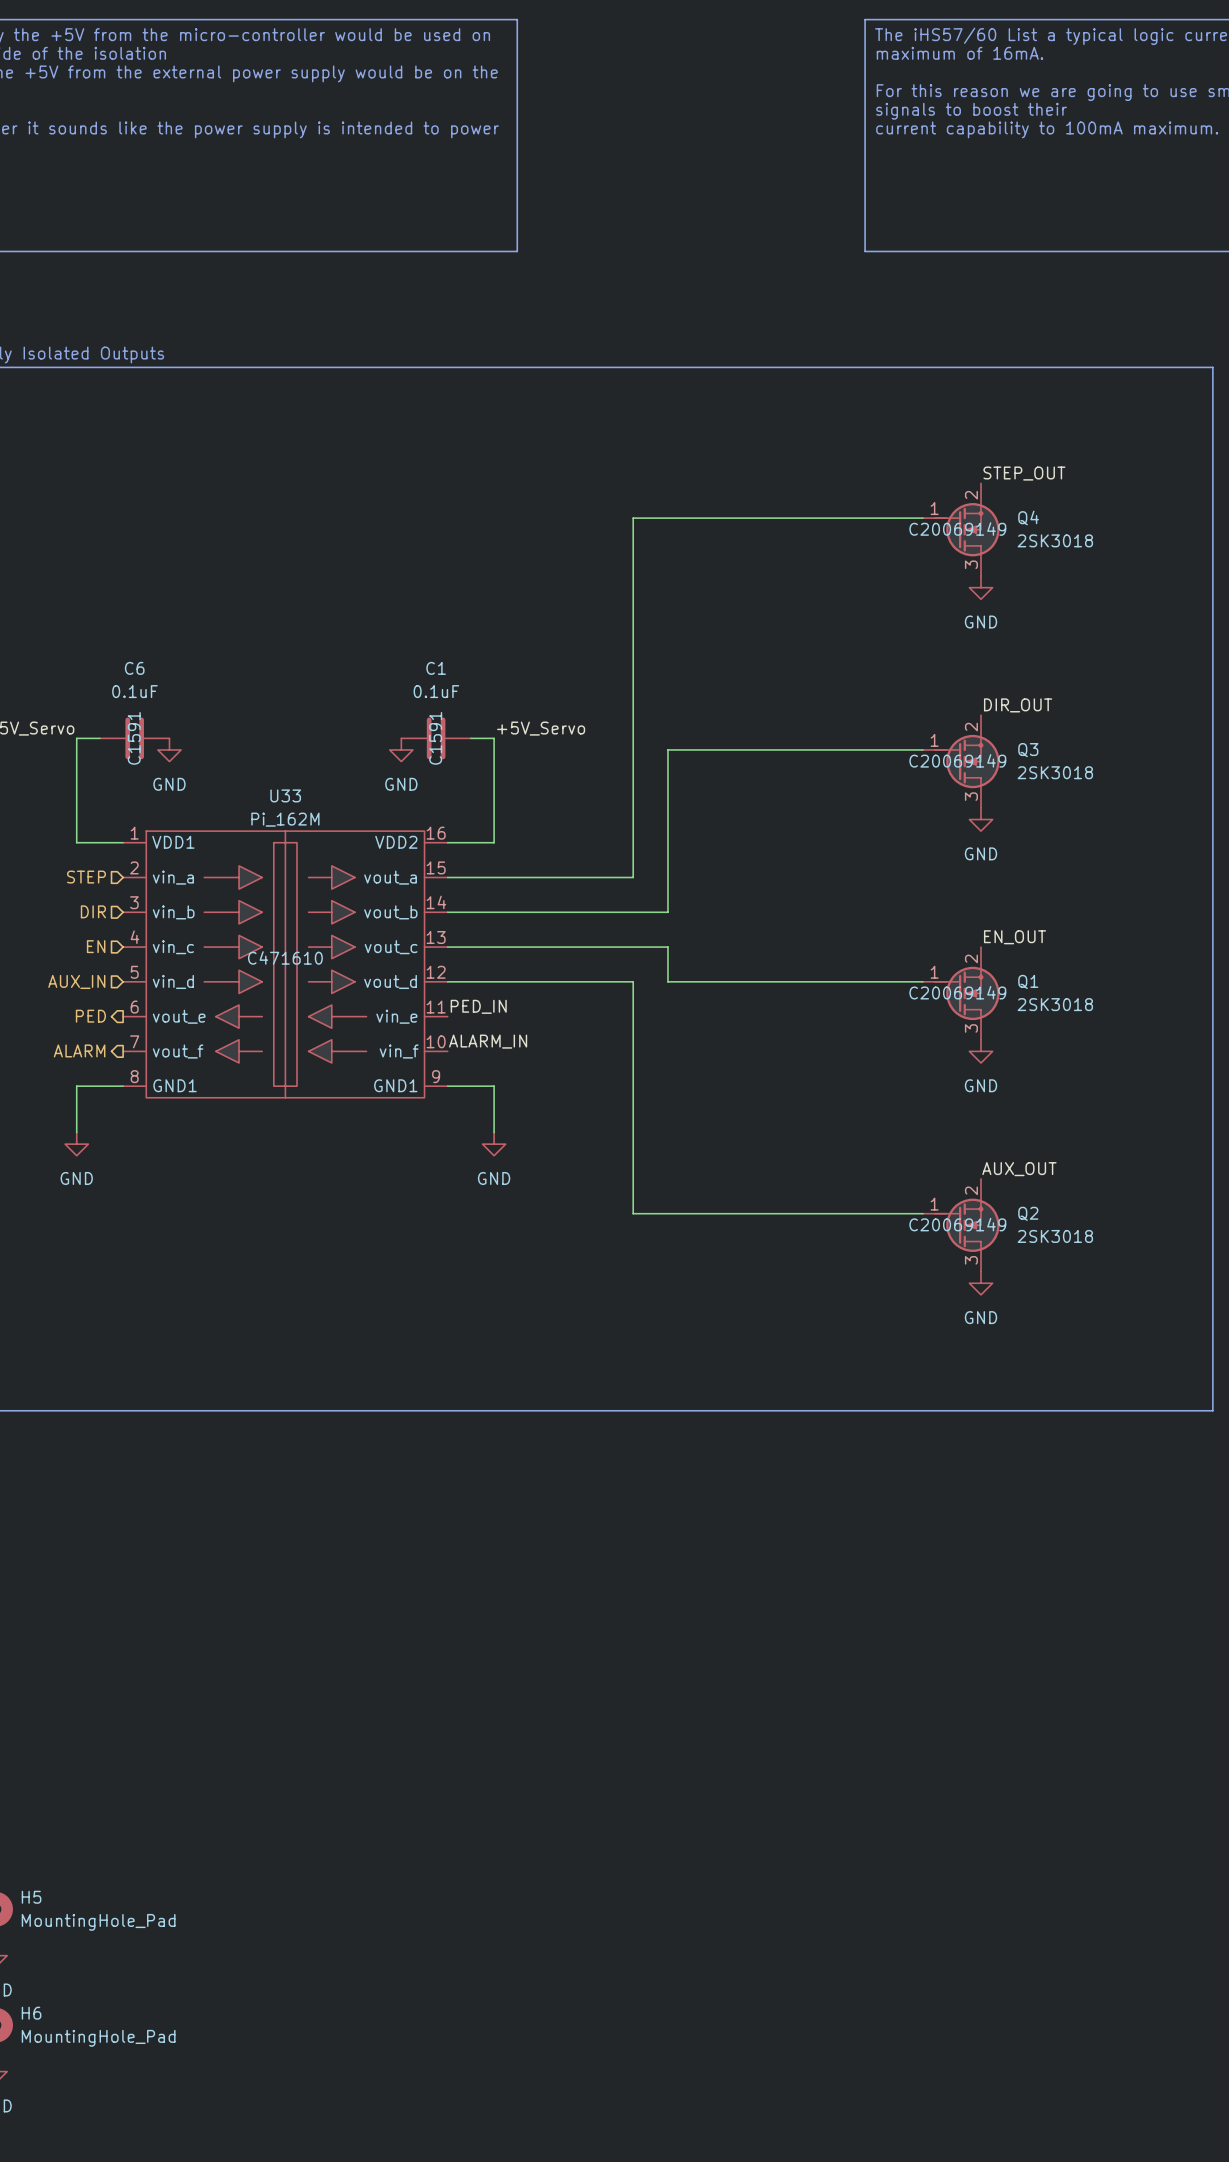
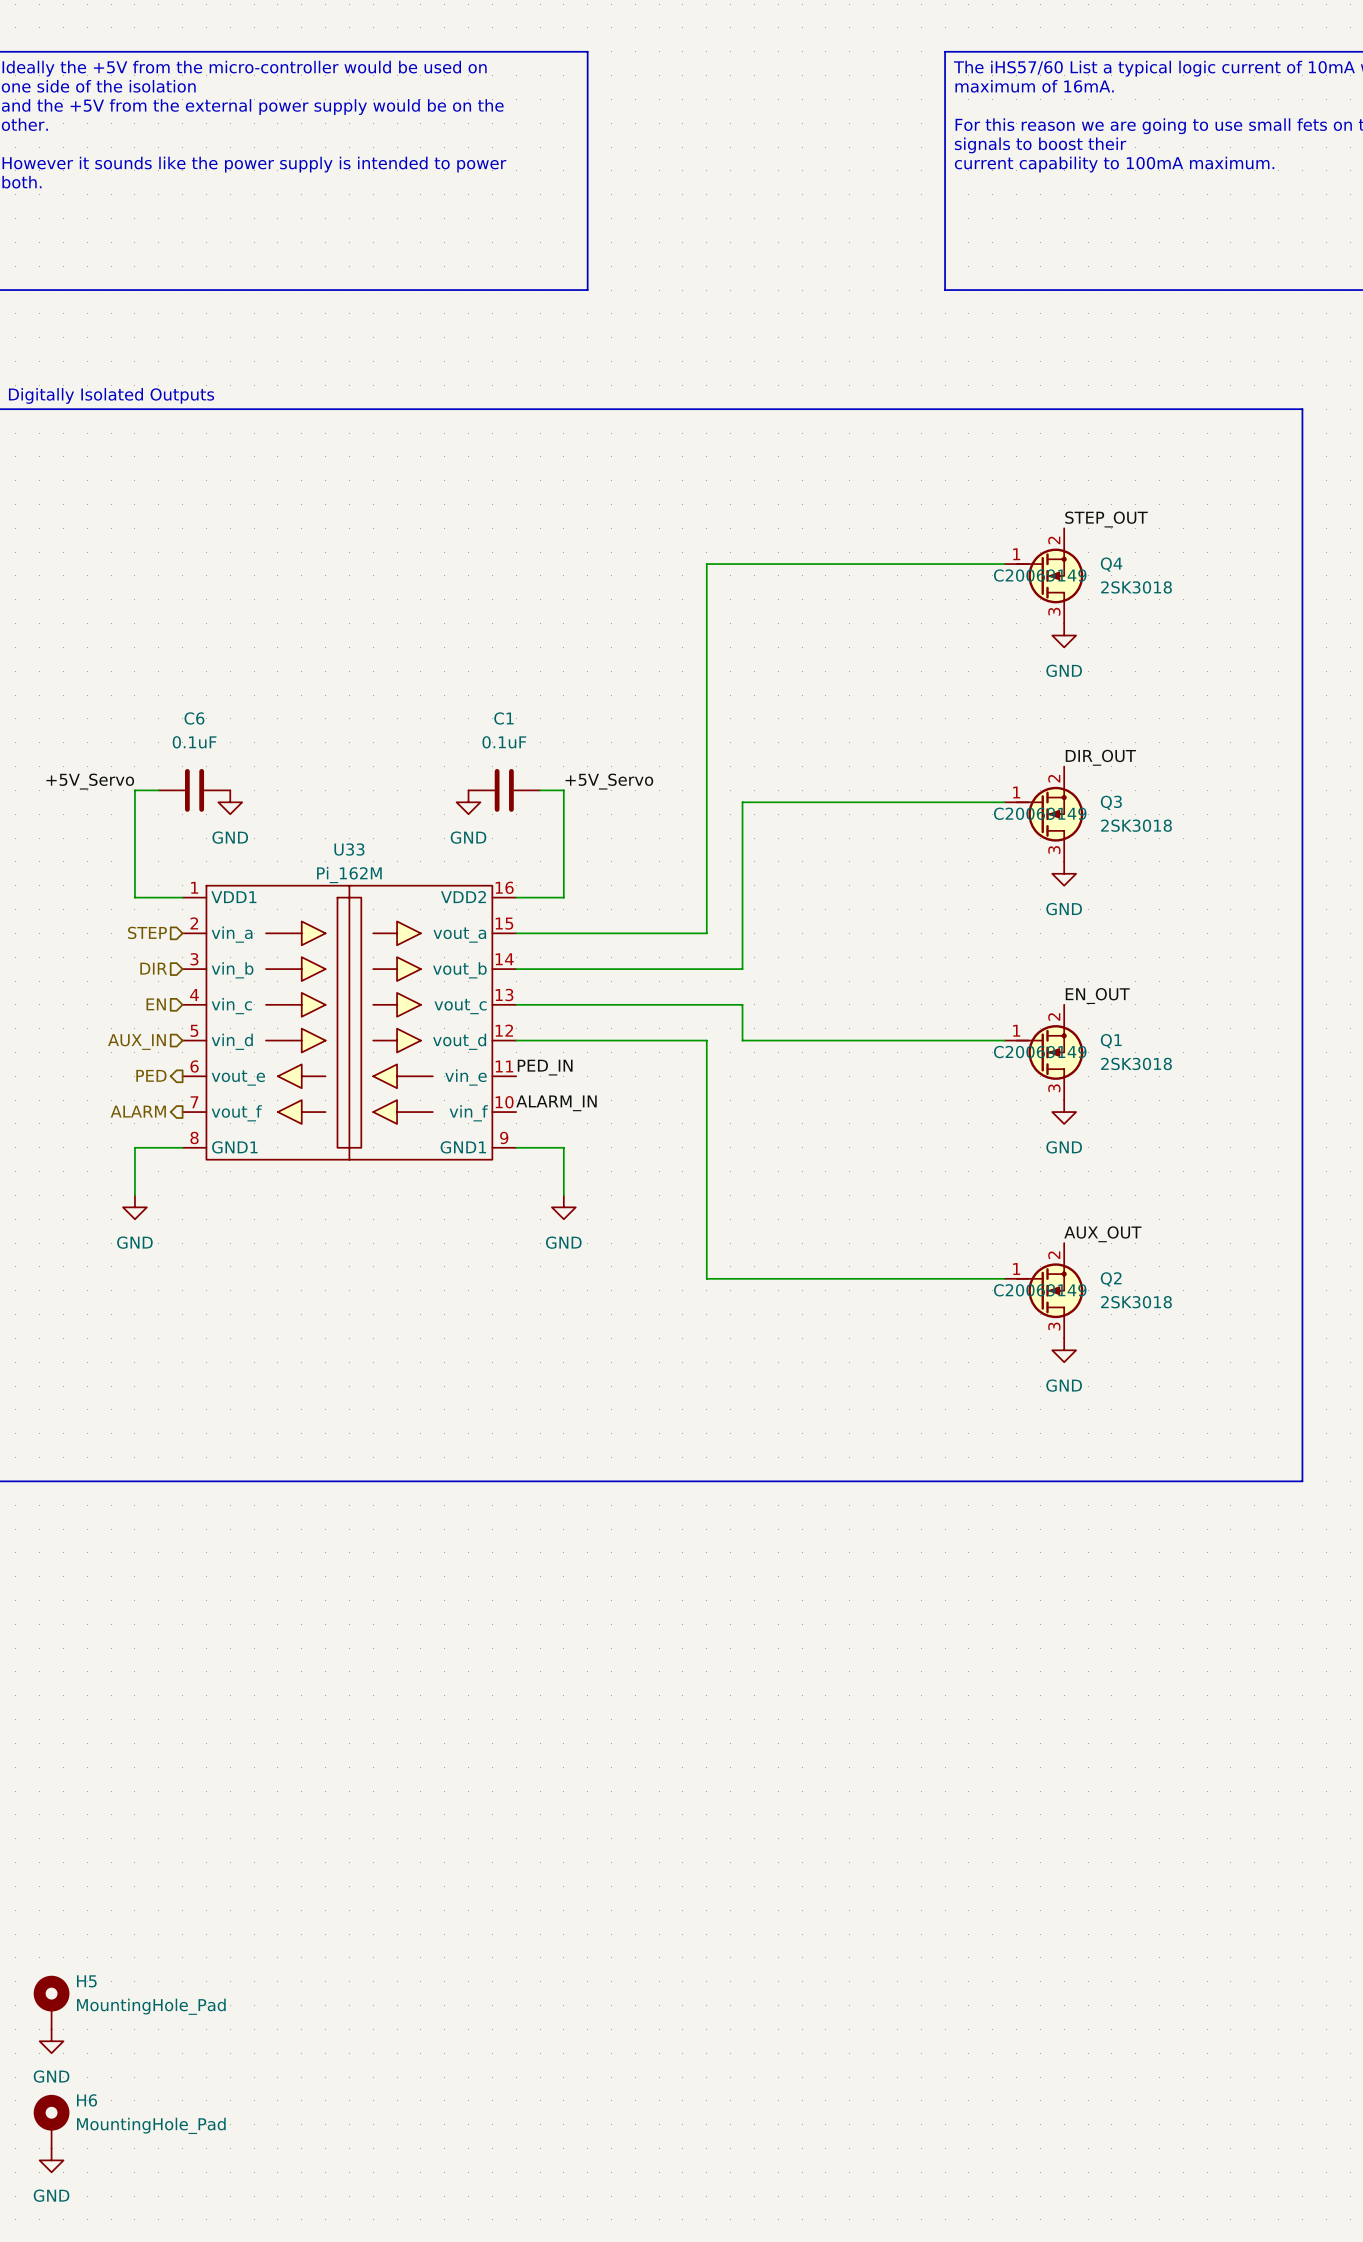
C6 text: C1591 (134, 738) -> none
C1 text: C1591 (435, 738) -> none
U33 text: C471610 (285, 957) -> none

